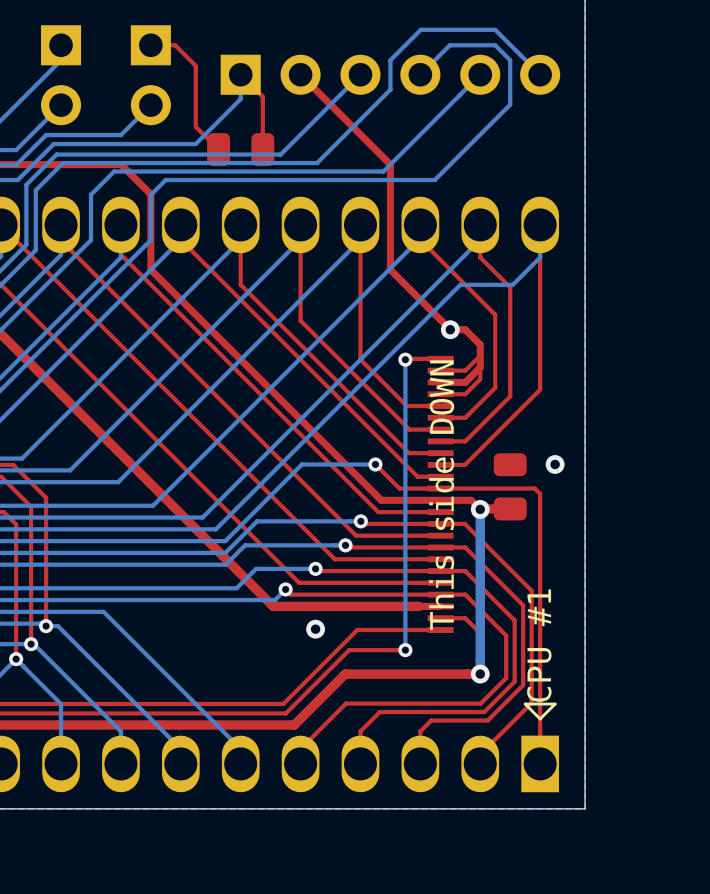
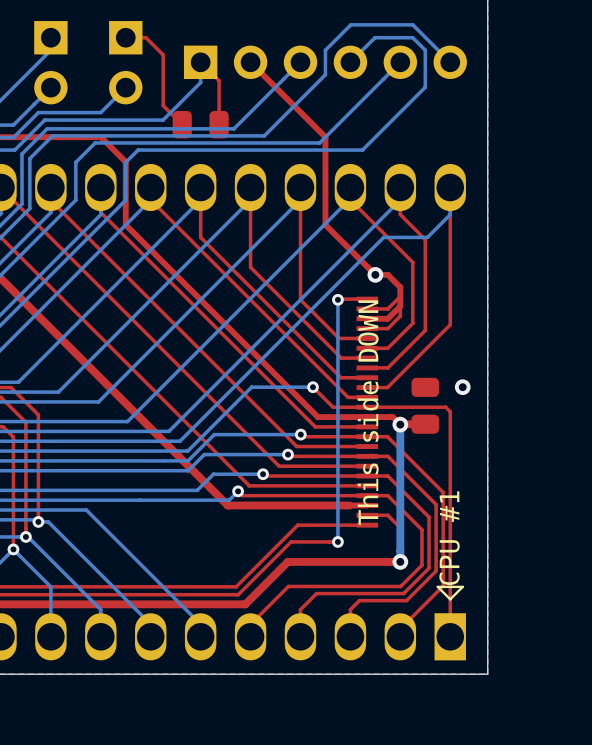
via: (315, 629) -> none

